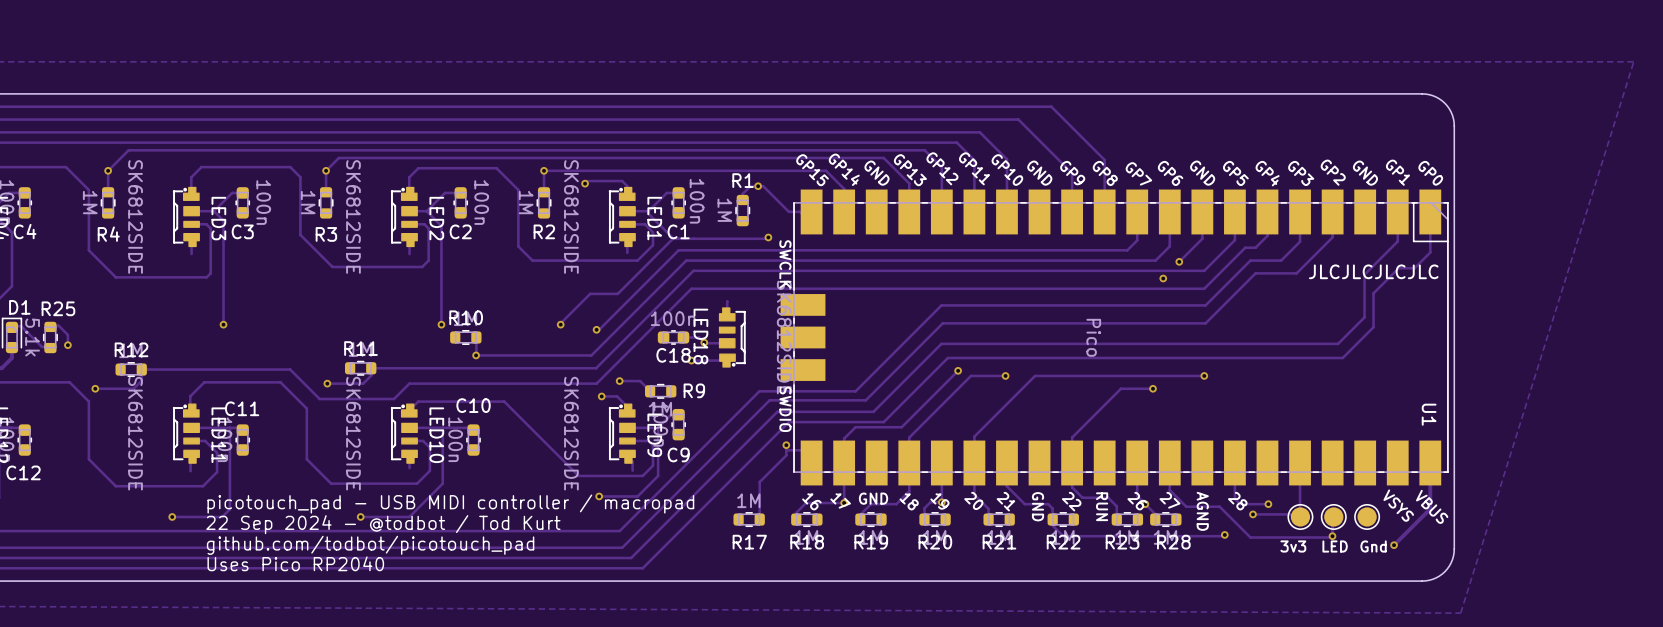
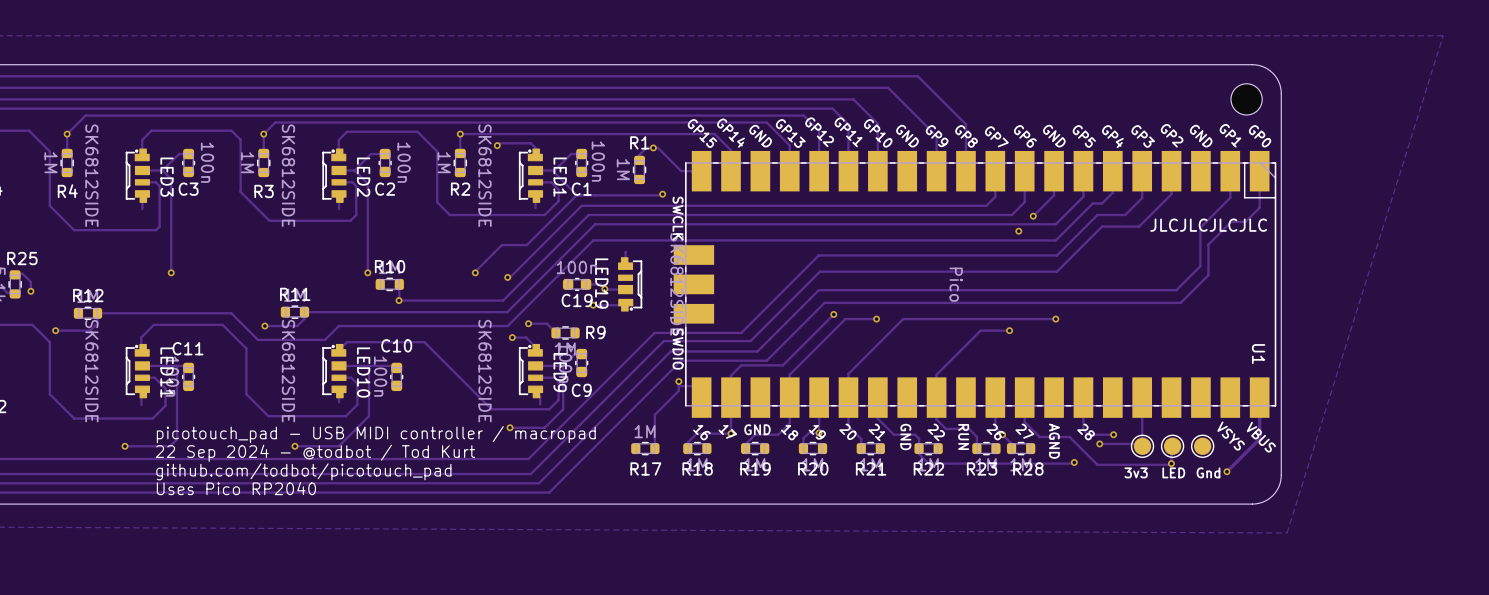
part: none -> (1246, 99)
LED18 name: LED18 (700, 336) -> LED19 (601, 283)
C18 name: C18 (673, 355) -> C19 (577, 300)

